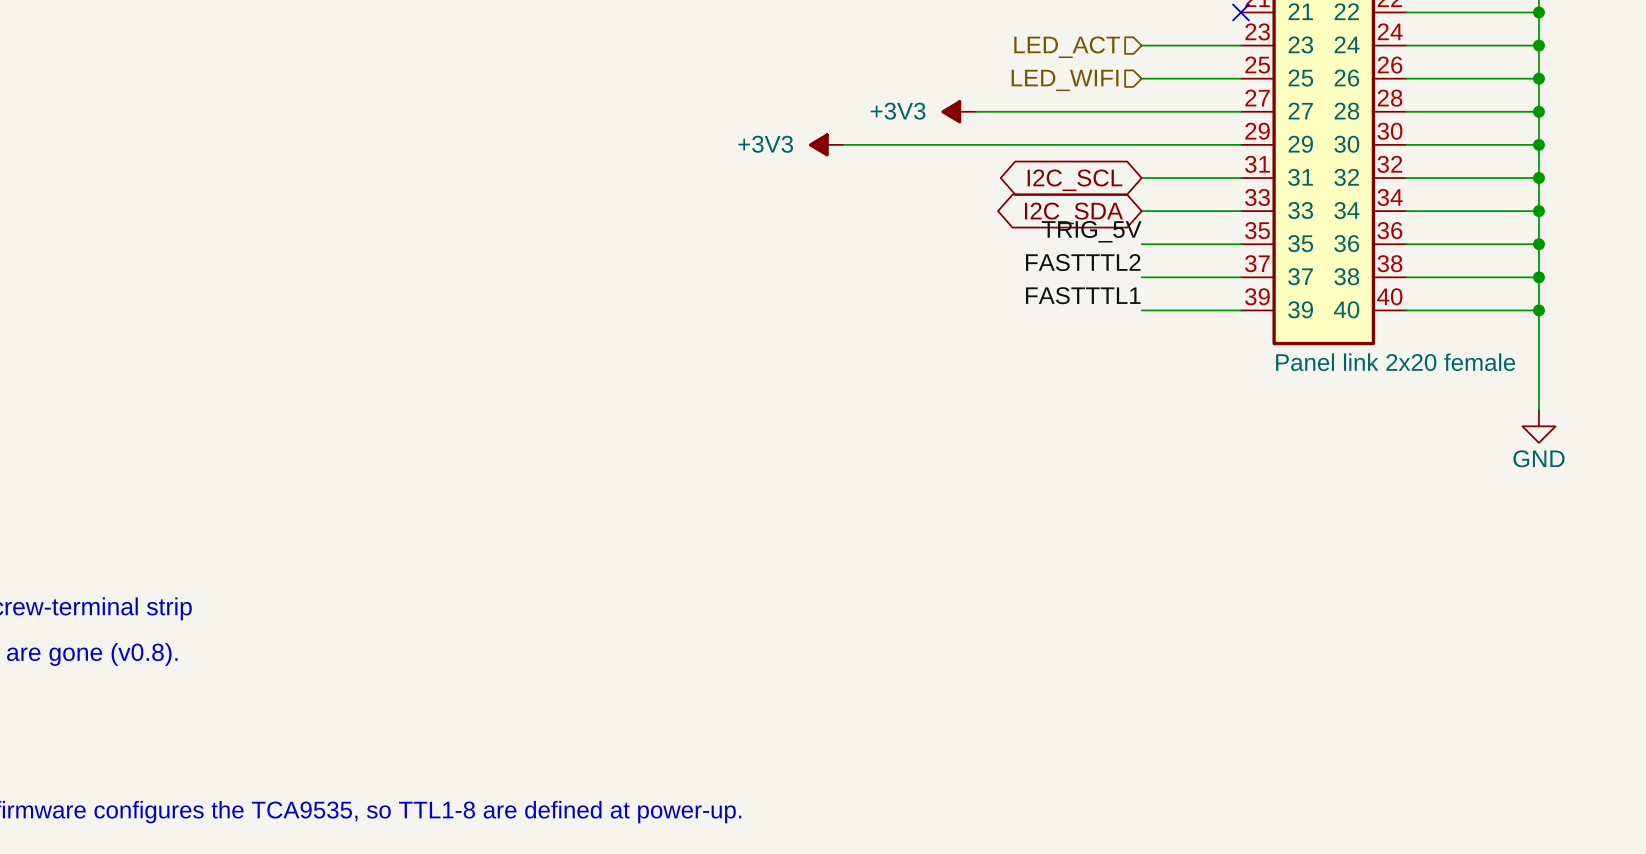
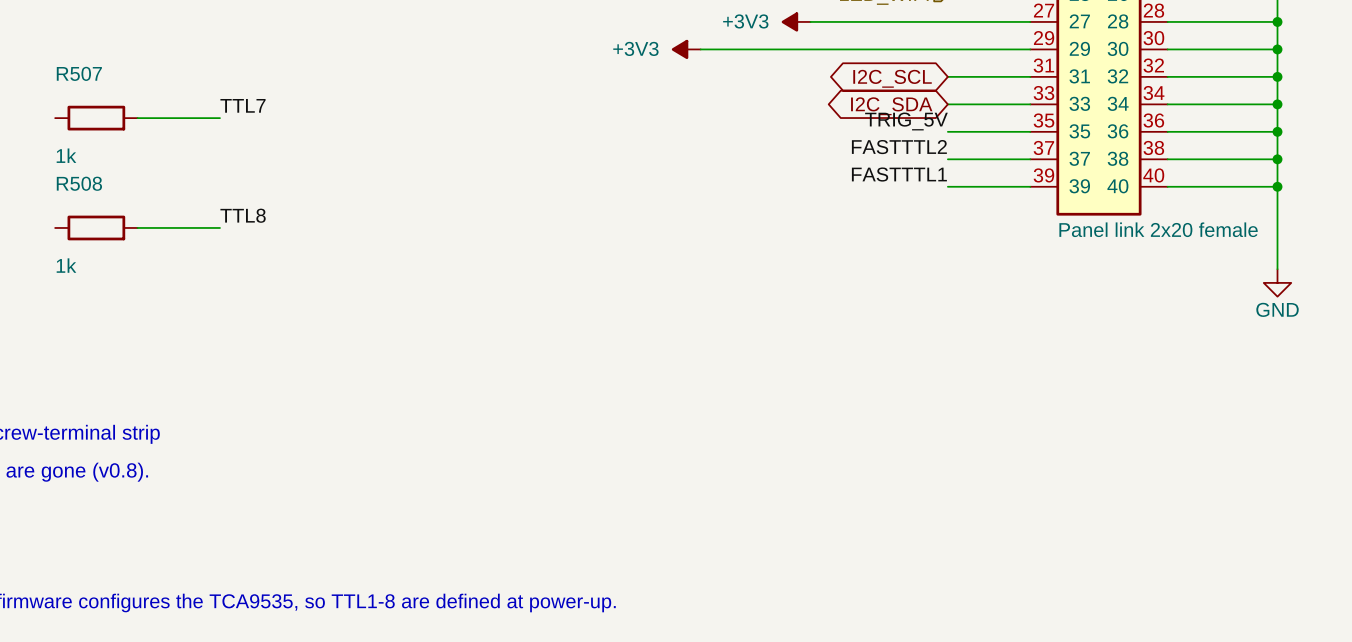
label: none -> TTL7 (242, 105)
R507: none -> 1k (96, 118)
wire: none -> (137, 118) (219, 118)
label: none -> TTL8 (243, 215)
R508: none -> 1k (96, 227)
wire: none -> (137, 227) (219, 227)

